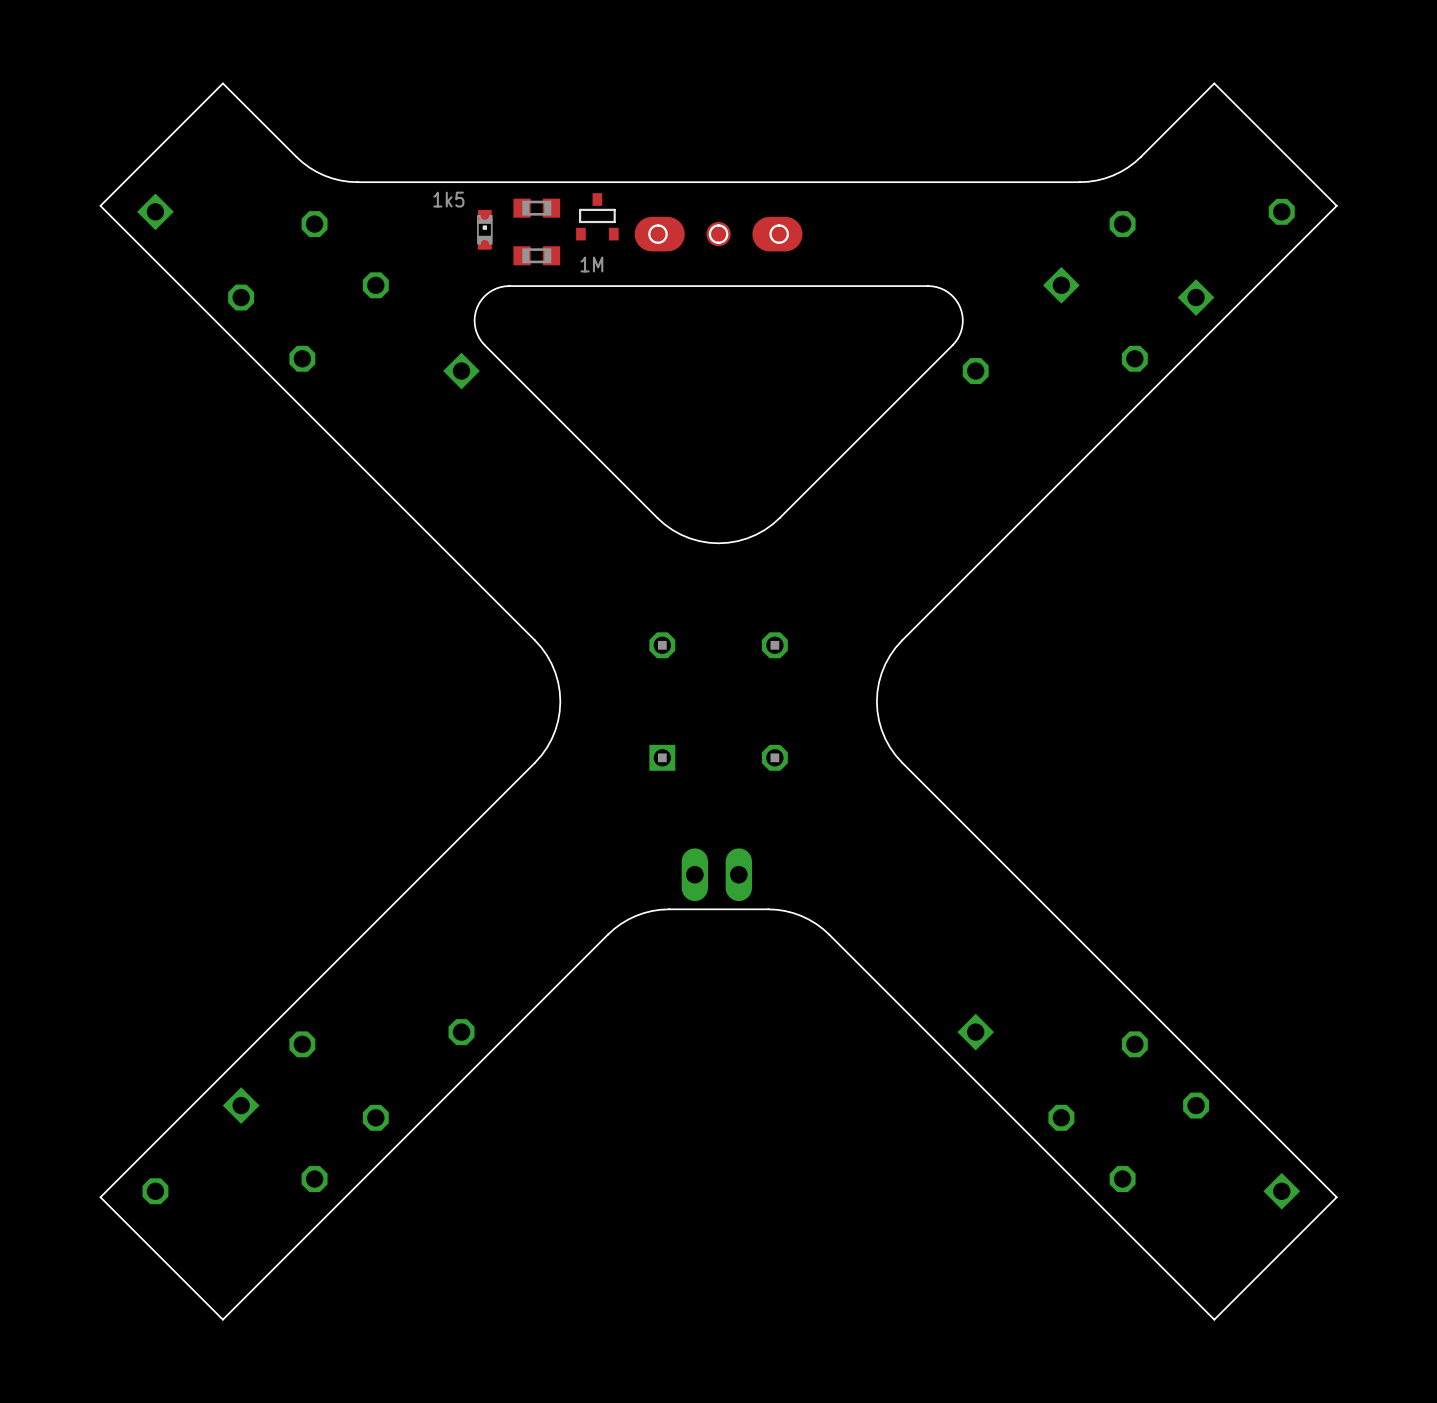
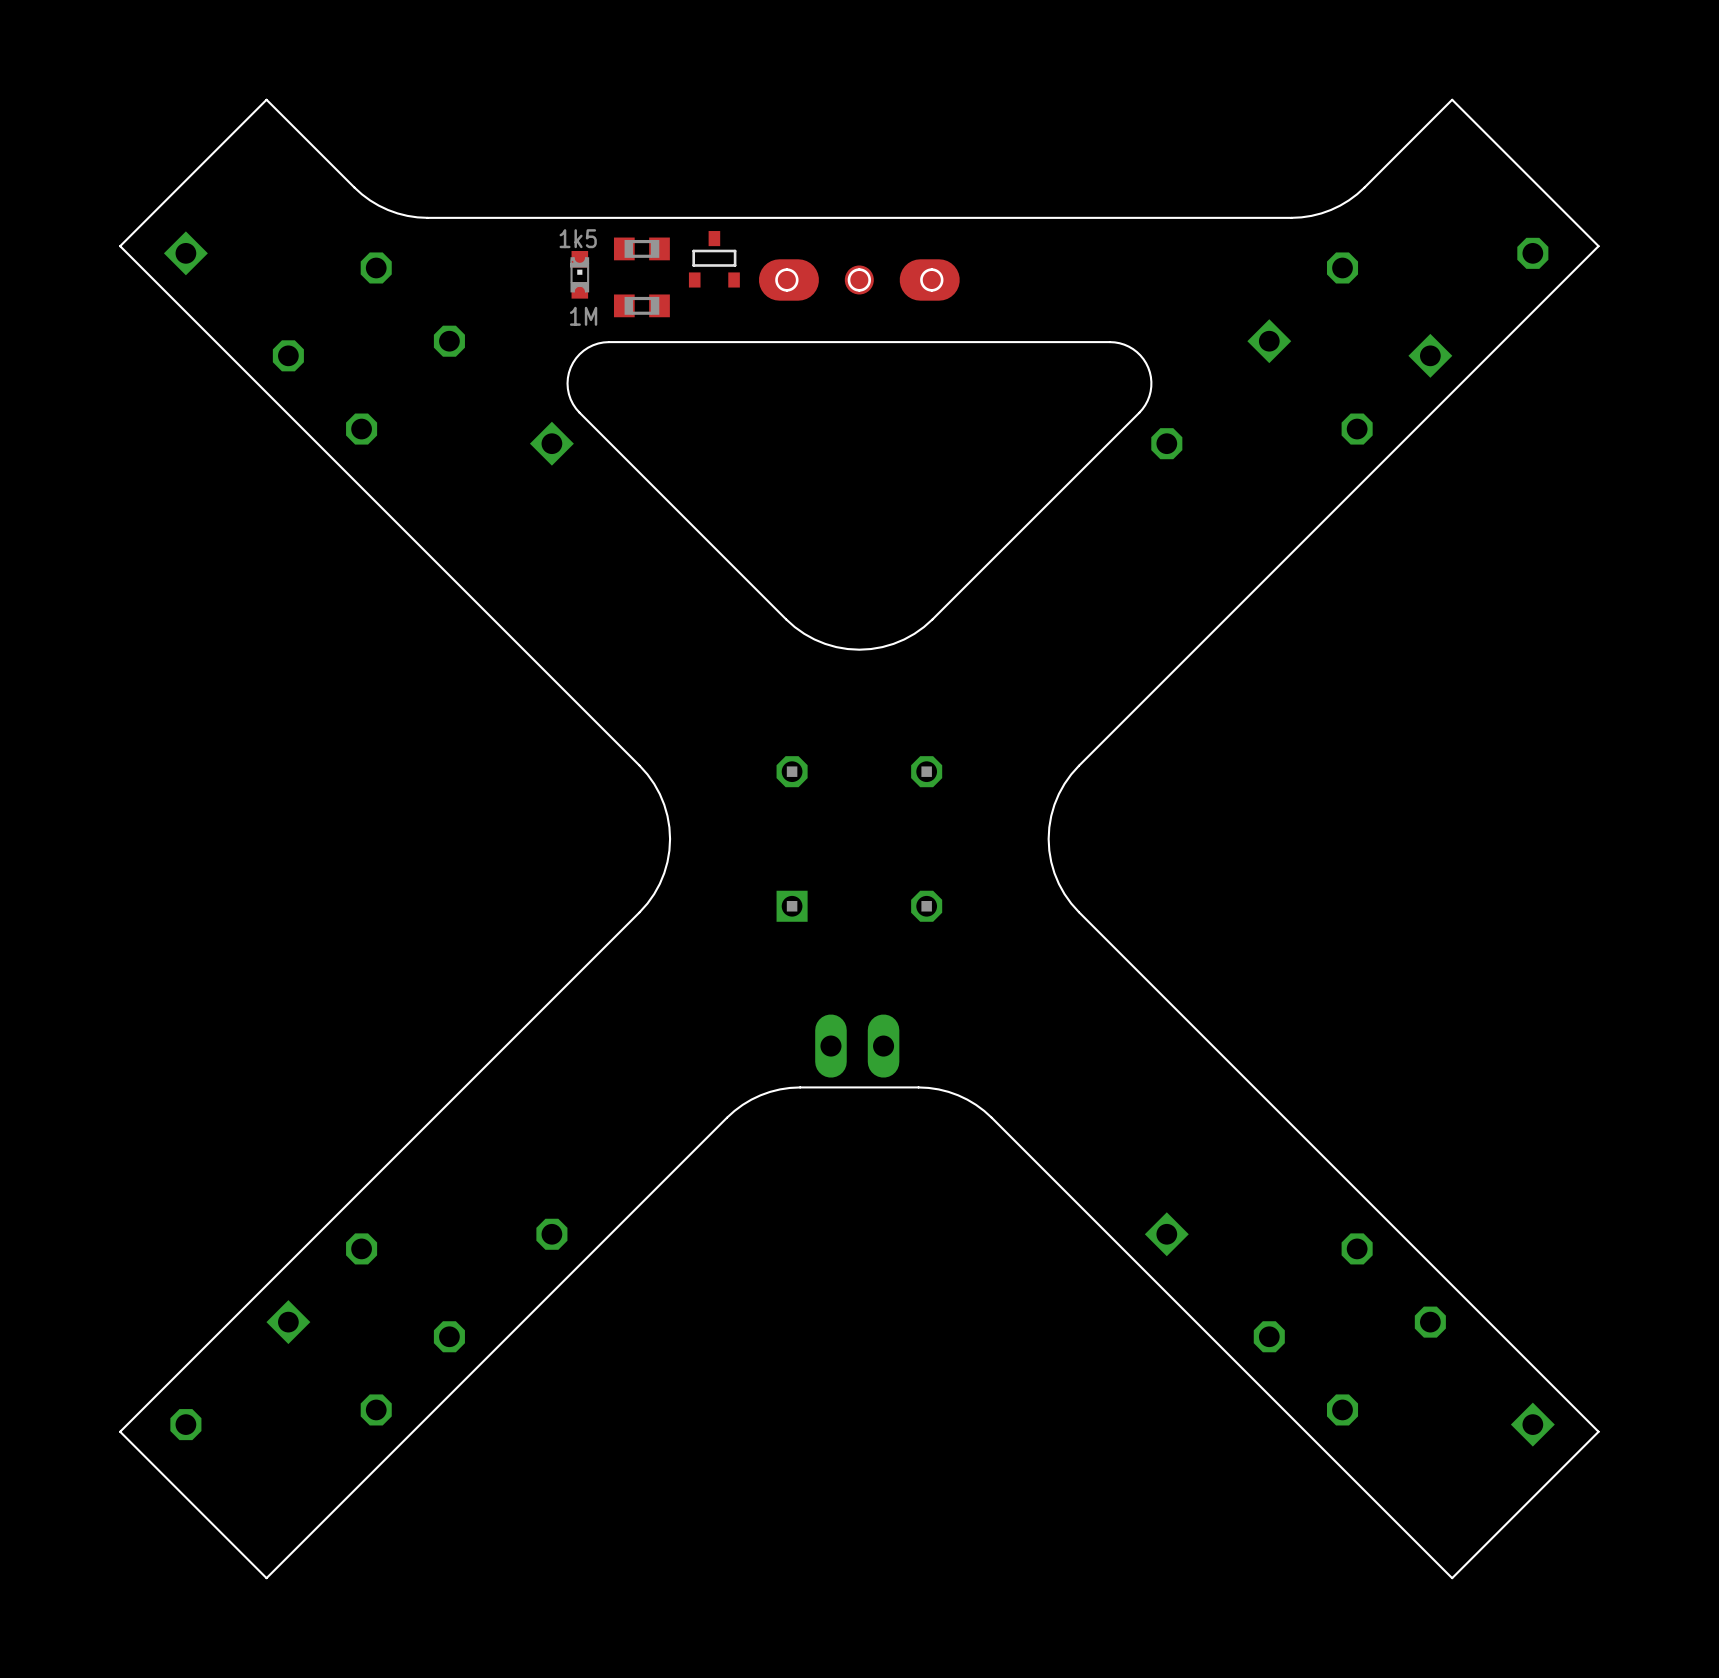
part value position: 1k5 (448, 199) -> 1k5 (578, 238)
part value position: 1M (591, 264) -> 1M (583, 316)

